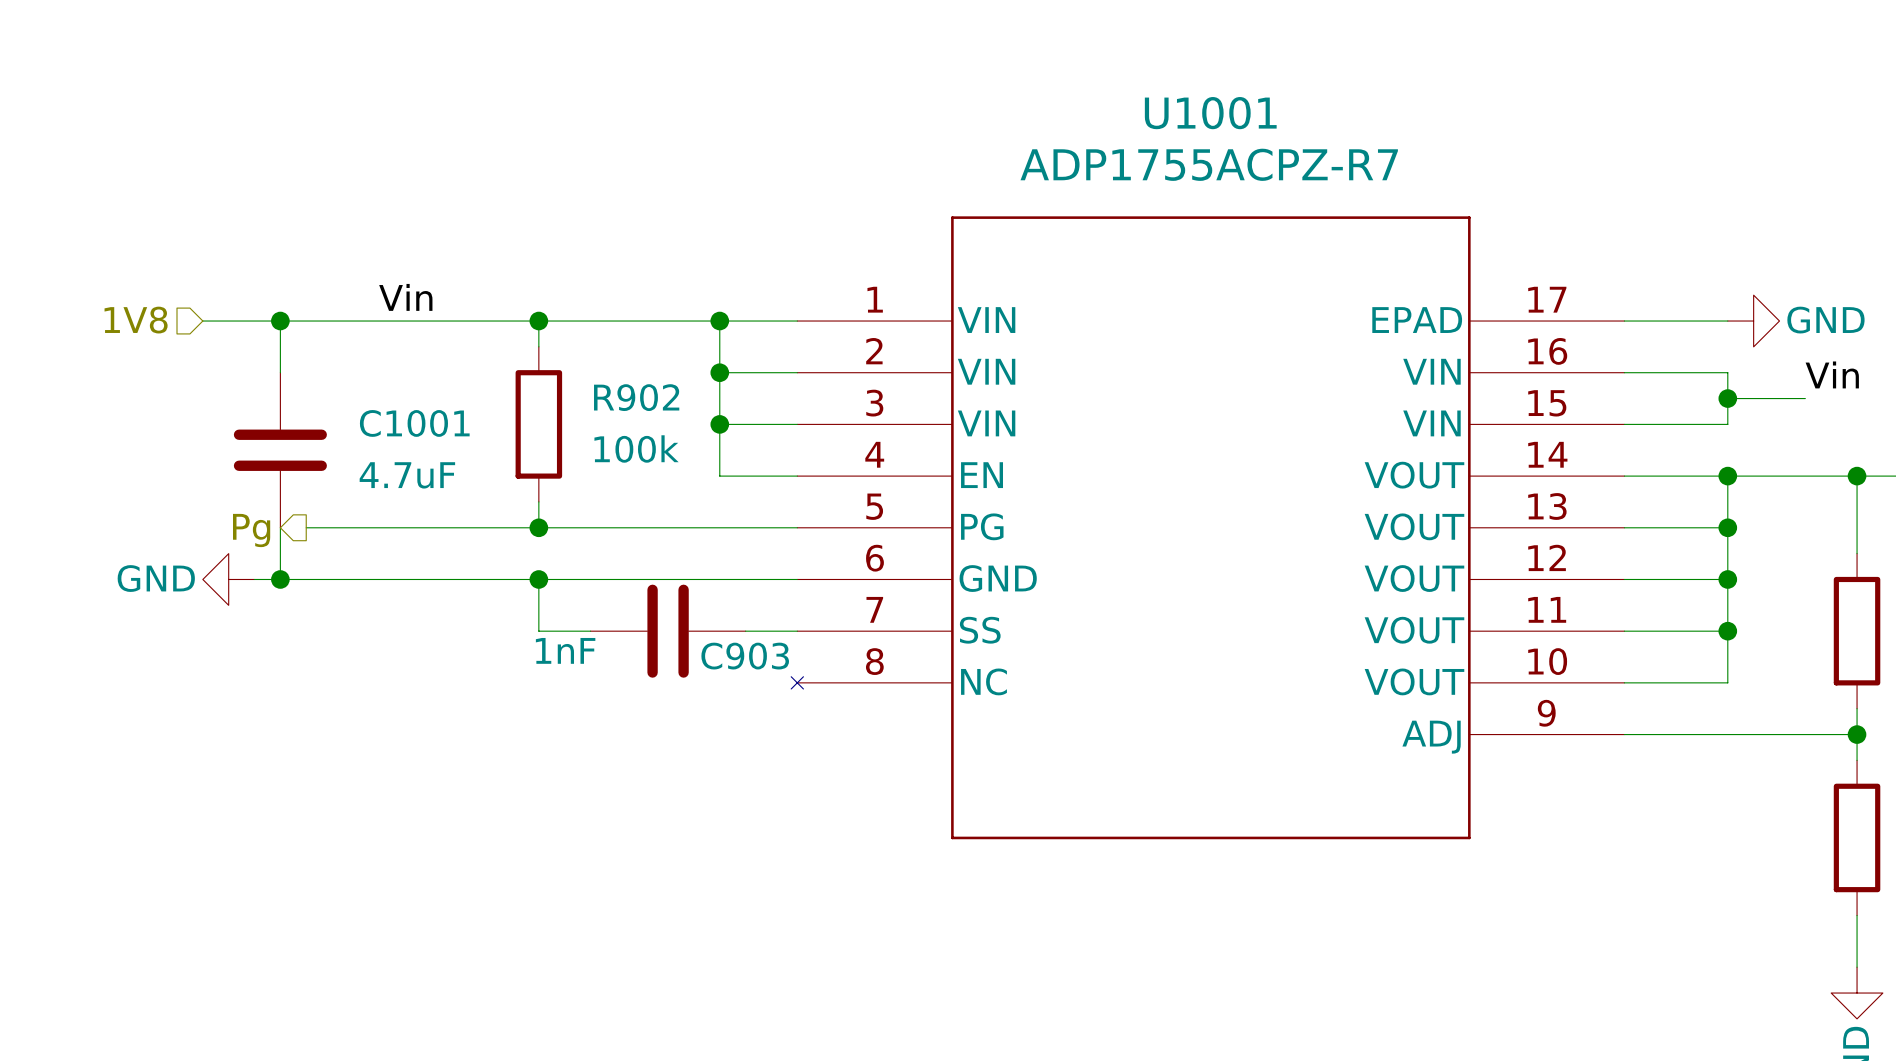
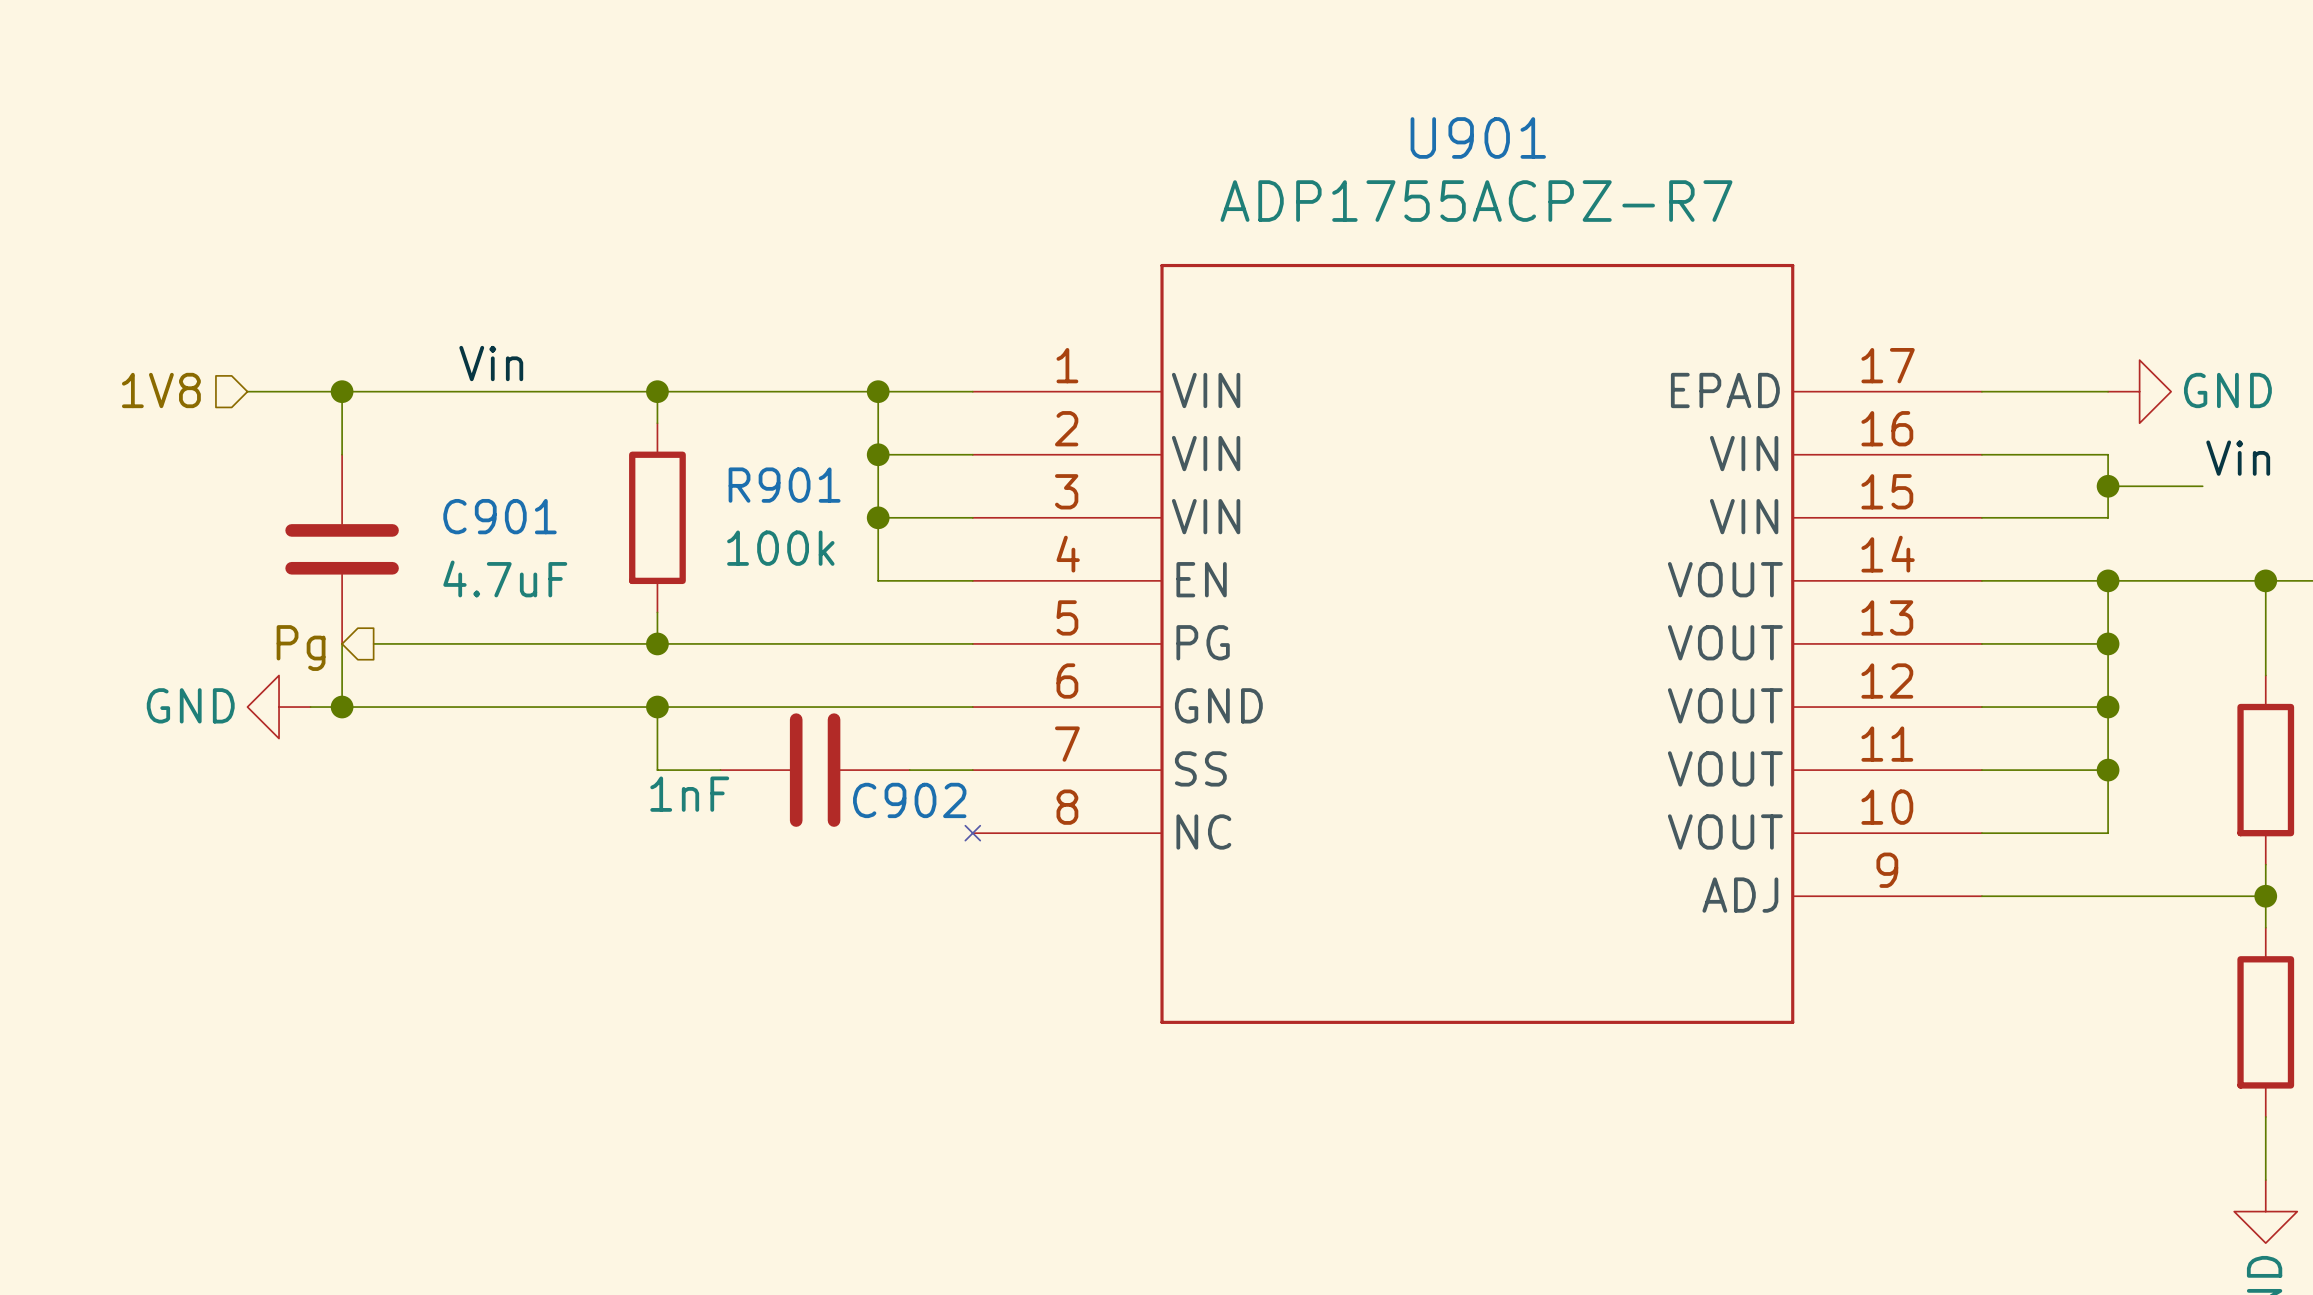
U1001 name: U1001 (1210, 113) -> U901 (1478, 137)
R902 name: R902 (636, 397) -> R901 (784, 485)
C1001 name: C1001 (414, 423) -> C901 (500, 516)
C903 name: C903 (745, 656) -> C902 (909, 800)

